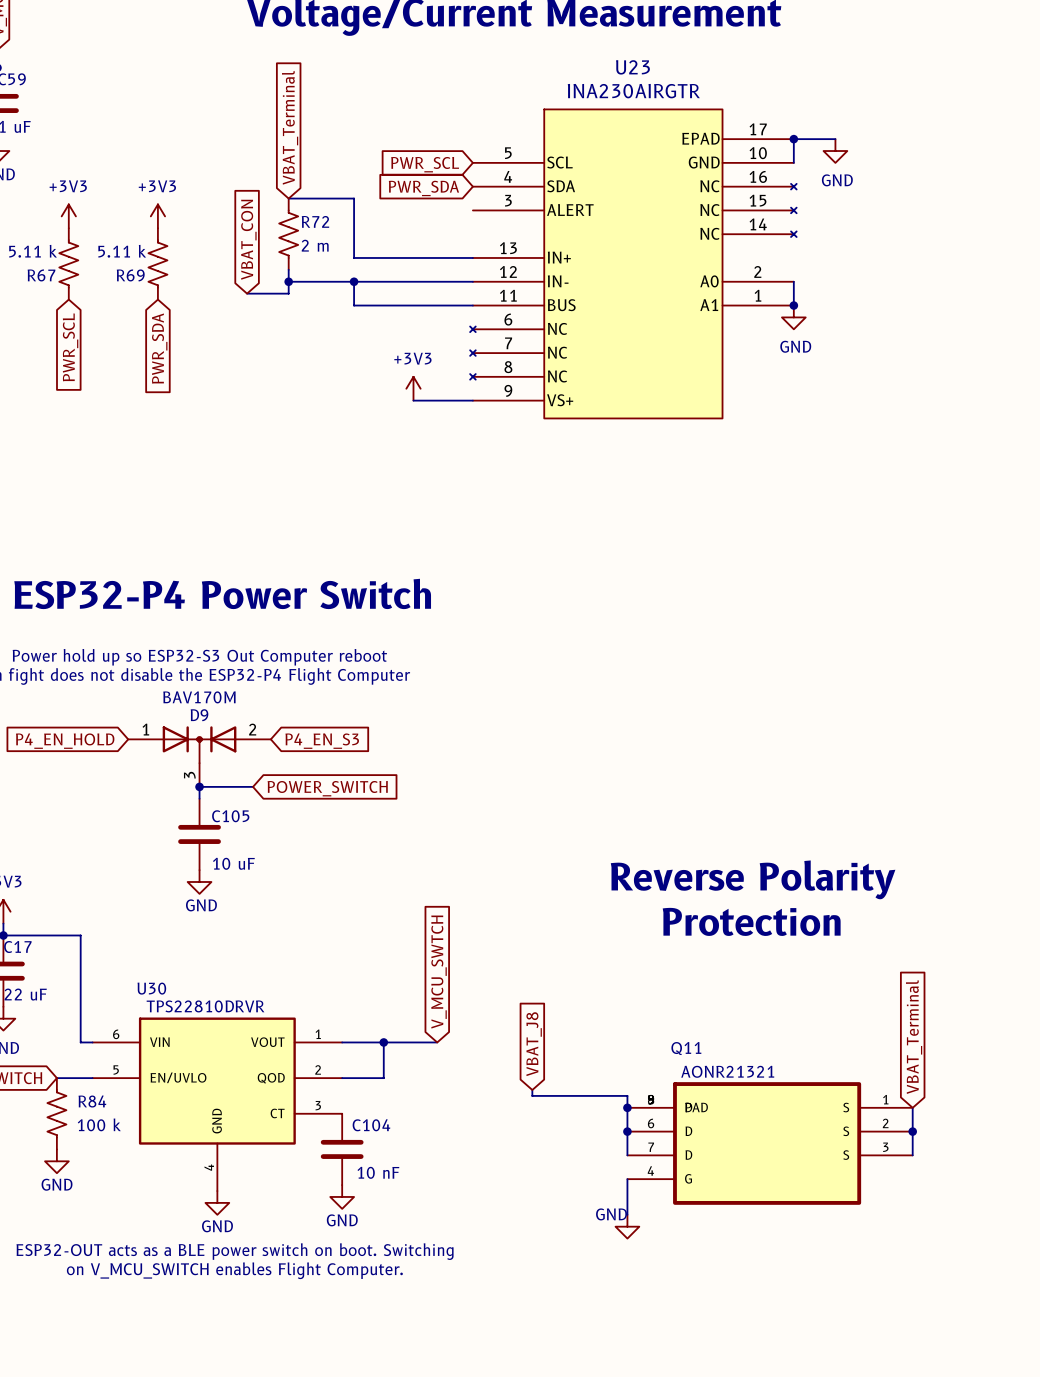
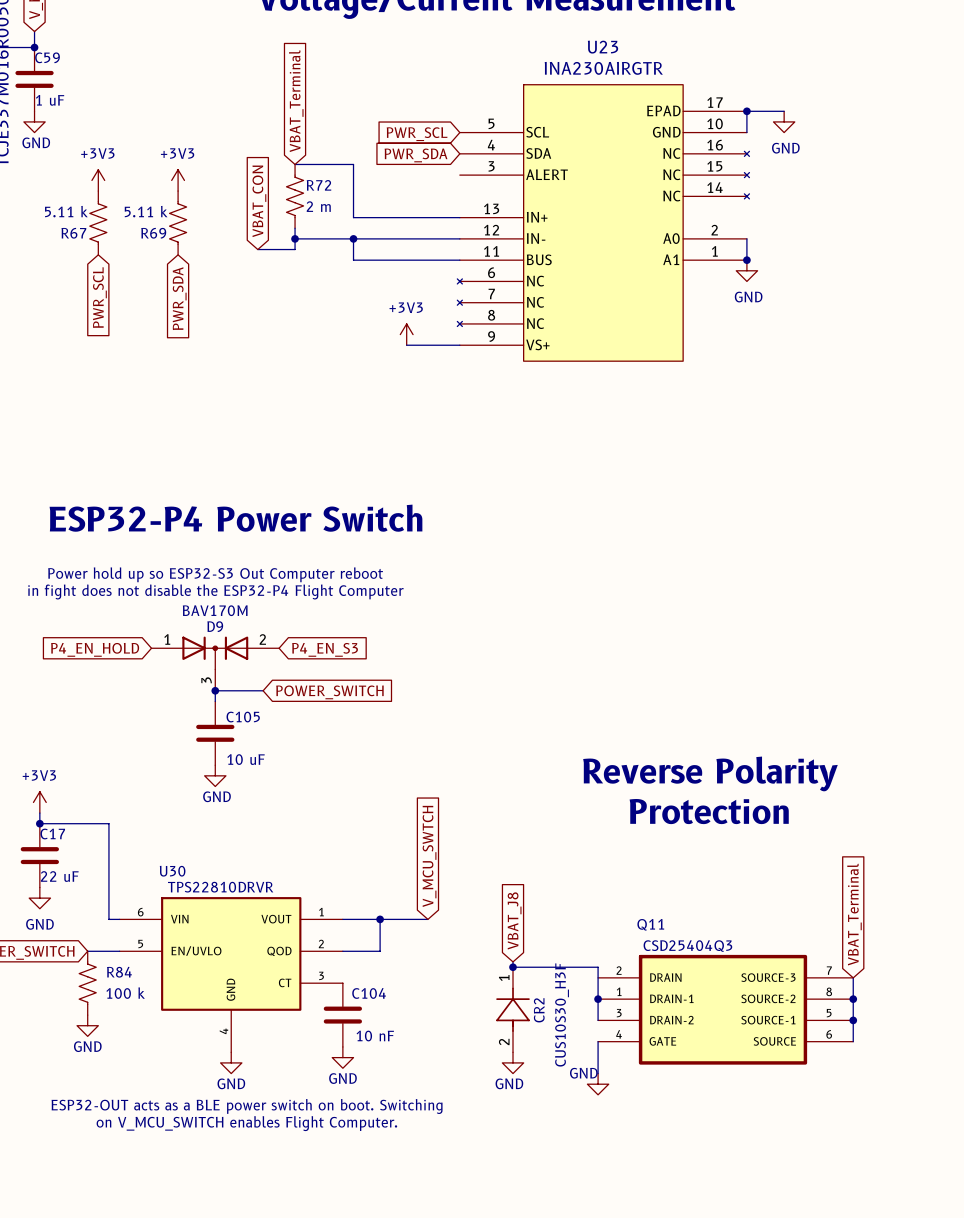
Q11 value: AONR21321 (727, 1071) -> CSD25404Q3 (687, 946)
Q11 symbol: [627, 1082, 913, 1205] -> [598, 954, 854, 1065]
junction: none -> (513, 967)
junction: (627, 1107) -> none
CR2: none -> CUS10S30_H3F (513, 1009)
wire: none -> (853, 1020) (853, 1041)
junction: none -> (853, 1020)
power symbol: none -> GND (513, 1062)

